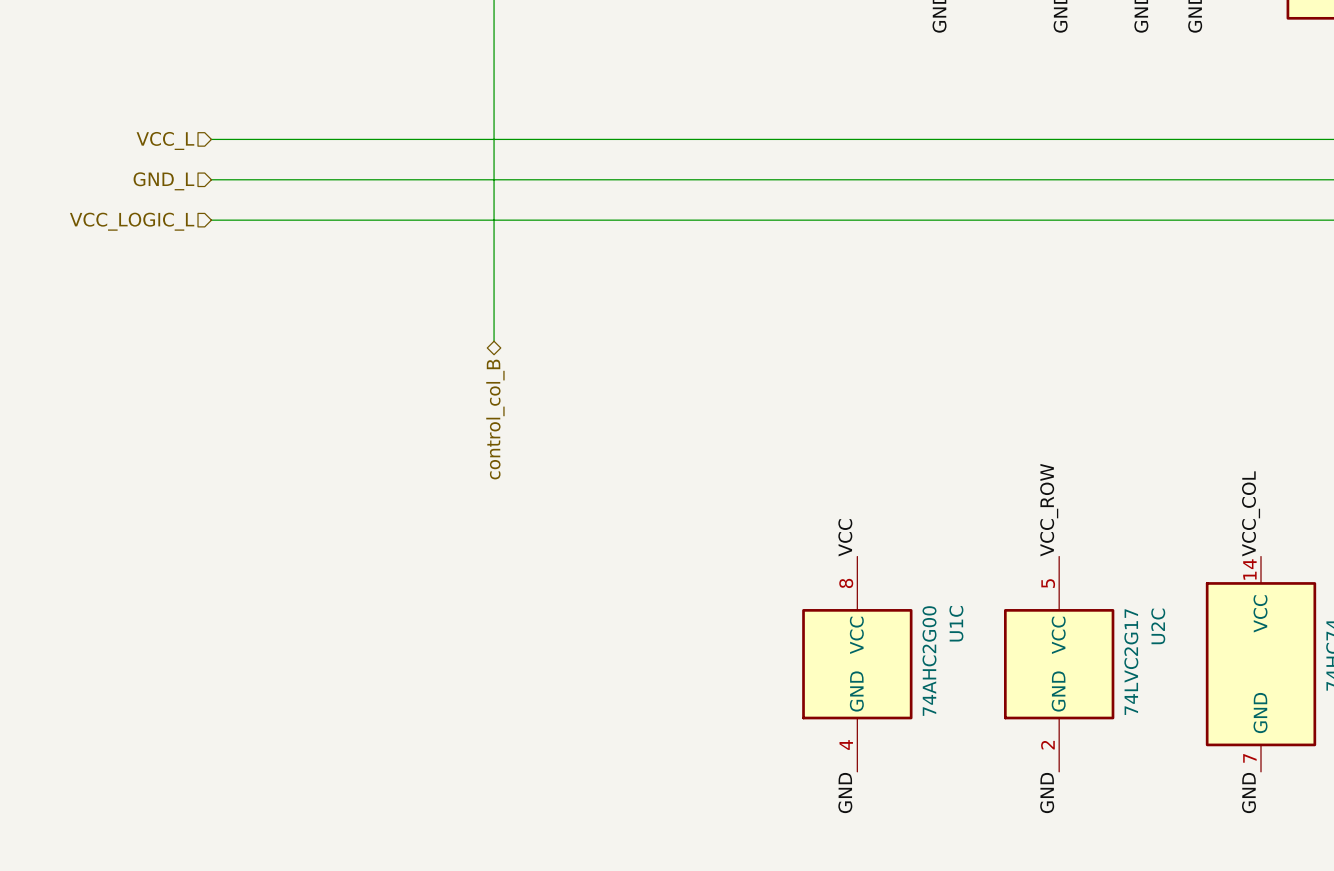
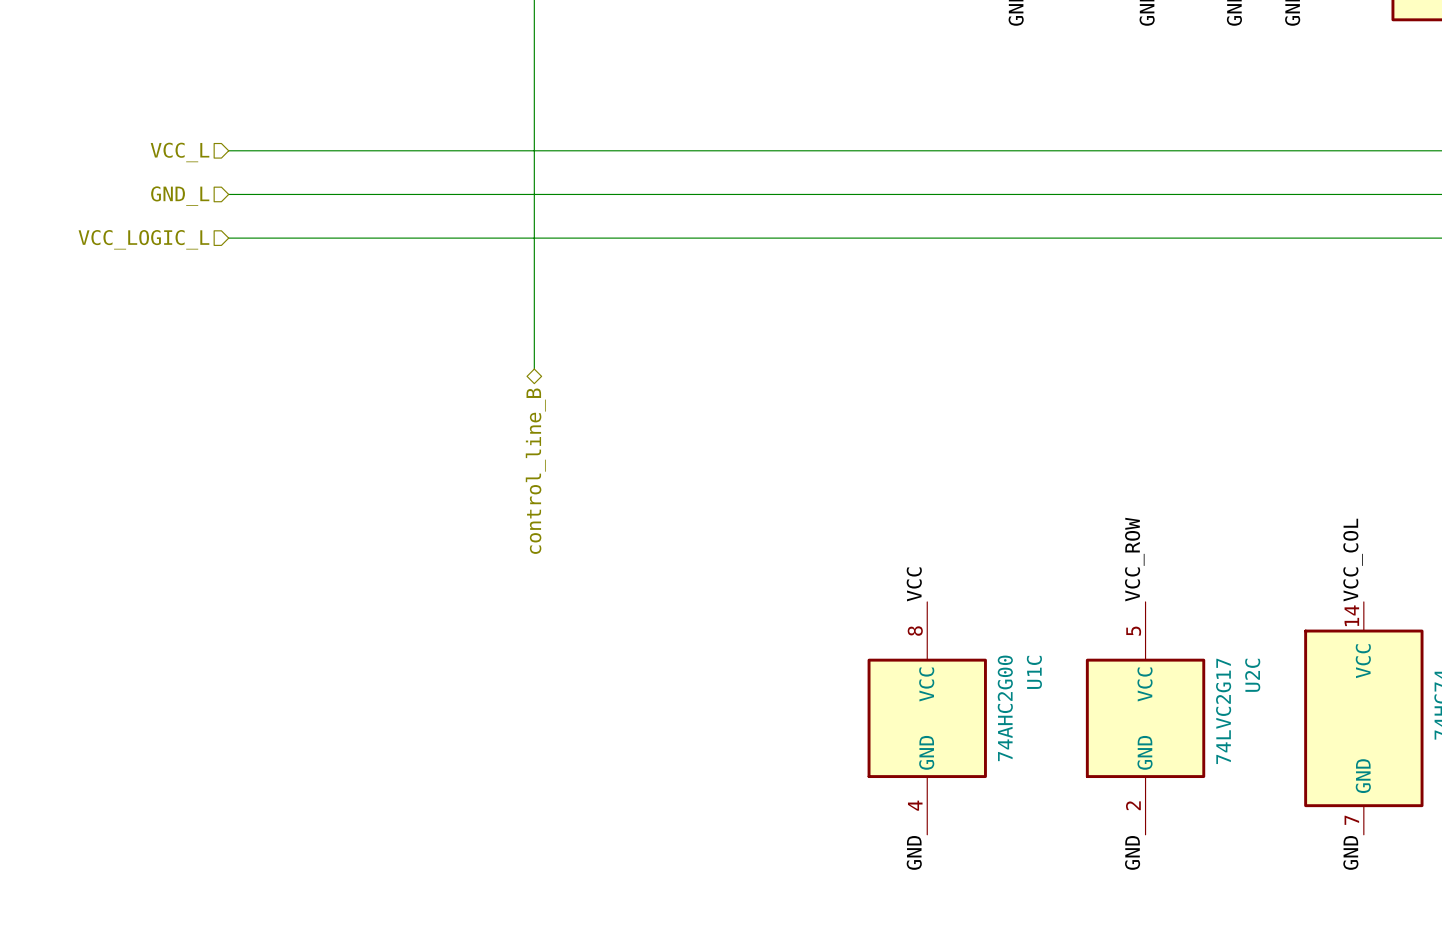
hierarchical label: control_col_B (495, 419) -> control_line_B (535, 471)

